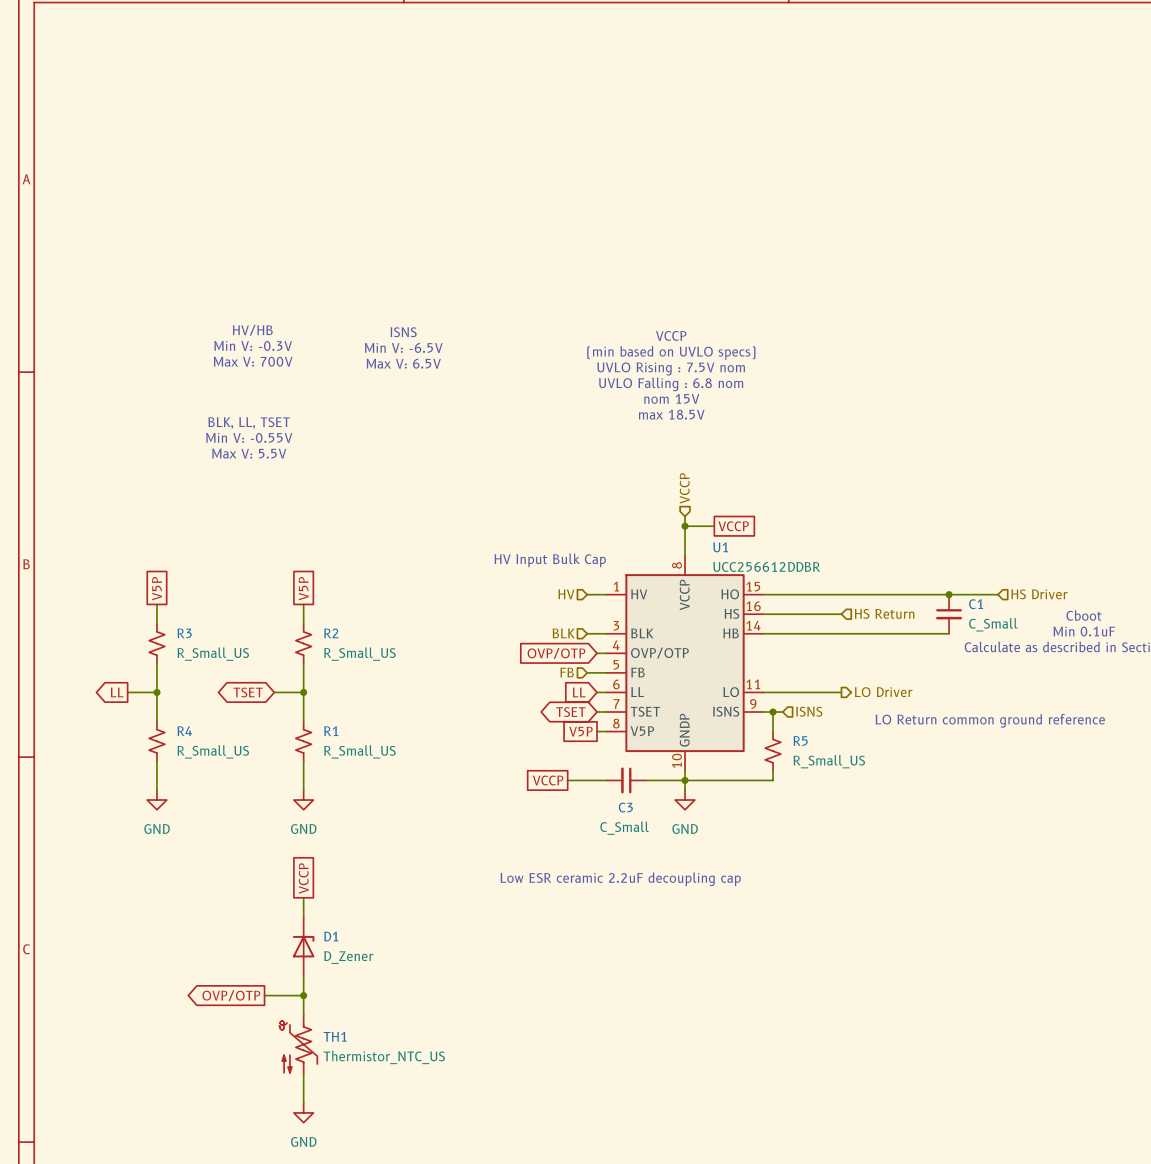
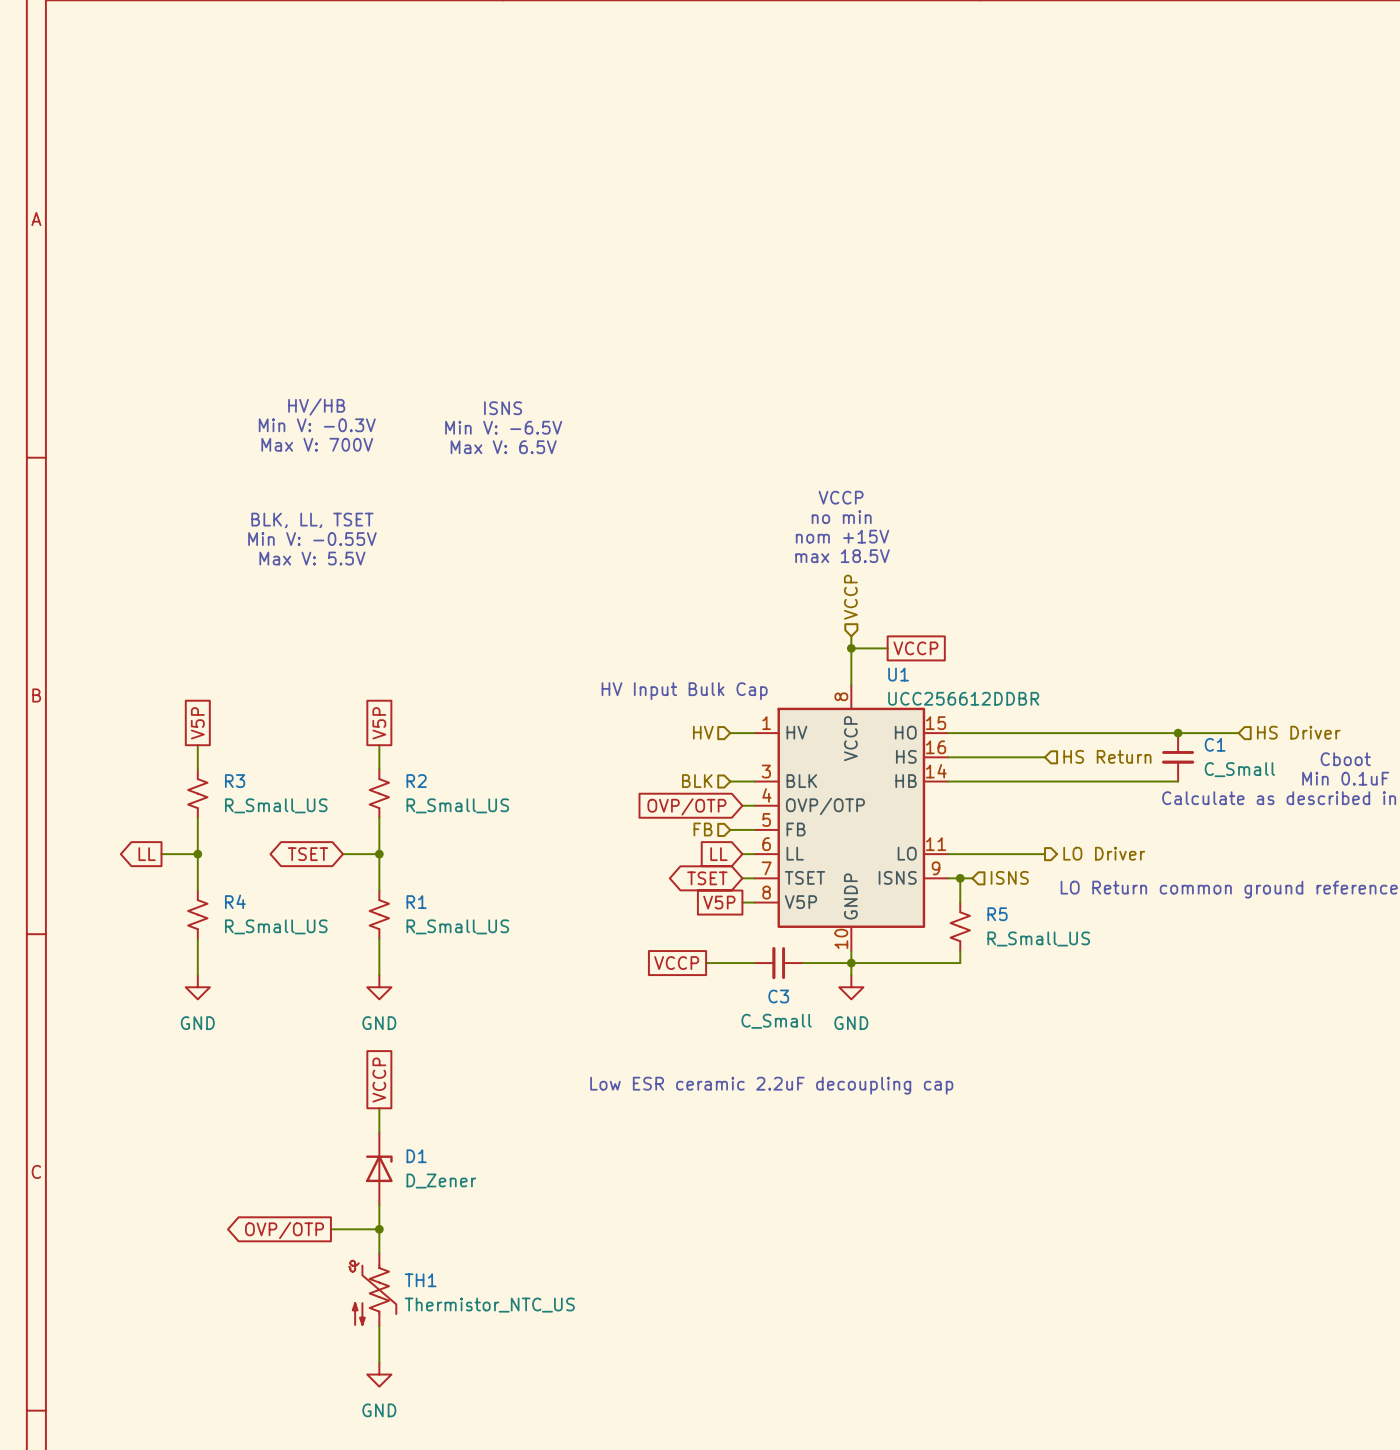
text position: VCCP (671, 335) -> VCCP (841, 497)
text: (min based on UVLO specs) (671, 352) -> none
text: UVLO Rising : 7.5V nom (671, 369) -> none
text: UVLO Falling : 6.8 nom (671, 384) -> none
text: nom 15V (671, 398) -> none
text position: max 18.5V (671, 414) -> max 18.5V (842, 556)
text: none -> no min (841, 517)
text: none -> nom +15V (842, 536)

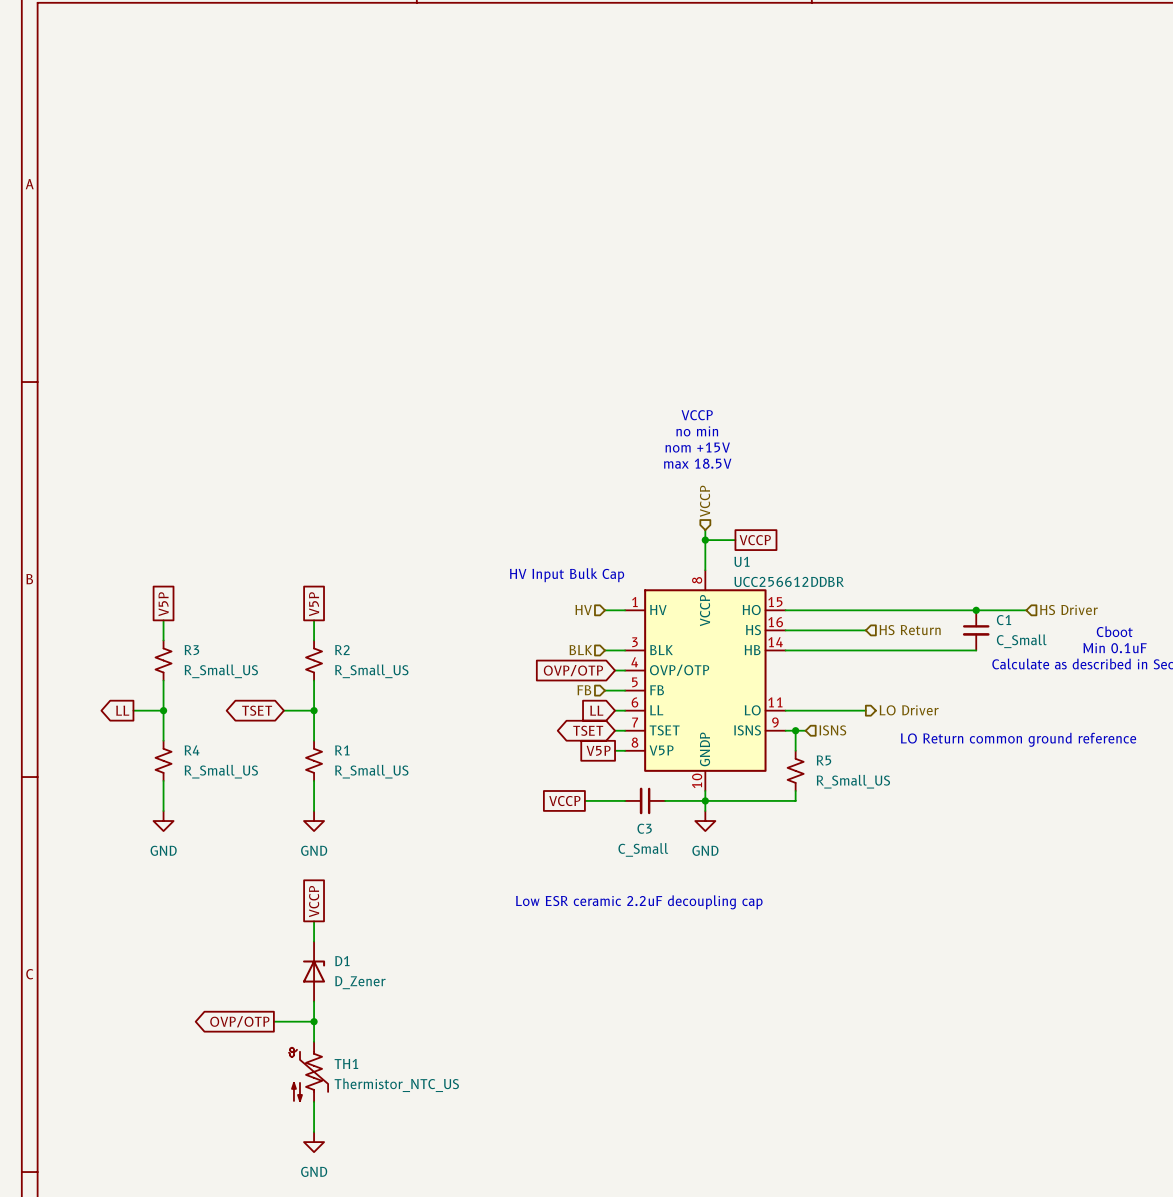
text: HV/HB (316, 406) -> none
text: ISNS (503, 408) -> none
text: Min V: -0.3V (317, 425) -> none
text: Min V: -6.5V (503, 427) -> none
text: Max V: 700V (317, 444) -> none
text: Max V: 6.5V (503, 447) -> none
text: BLK, LL, TSET (312, 520) -> none
text: Min V: -0.55V (312, 539) -> none
text: Max V: 5.5V (312, 558) -> none

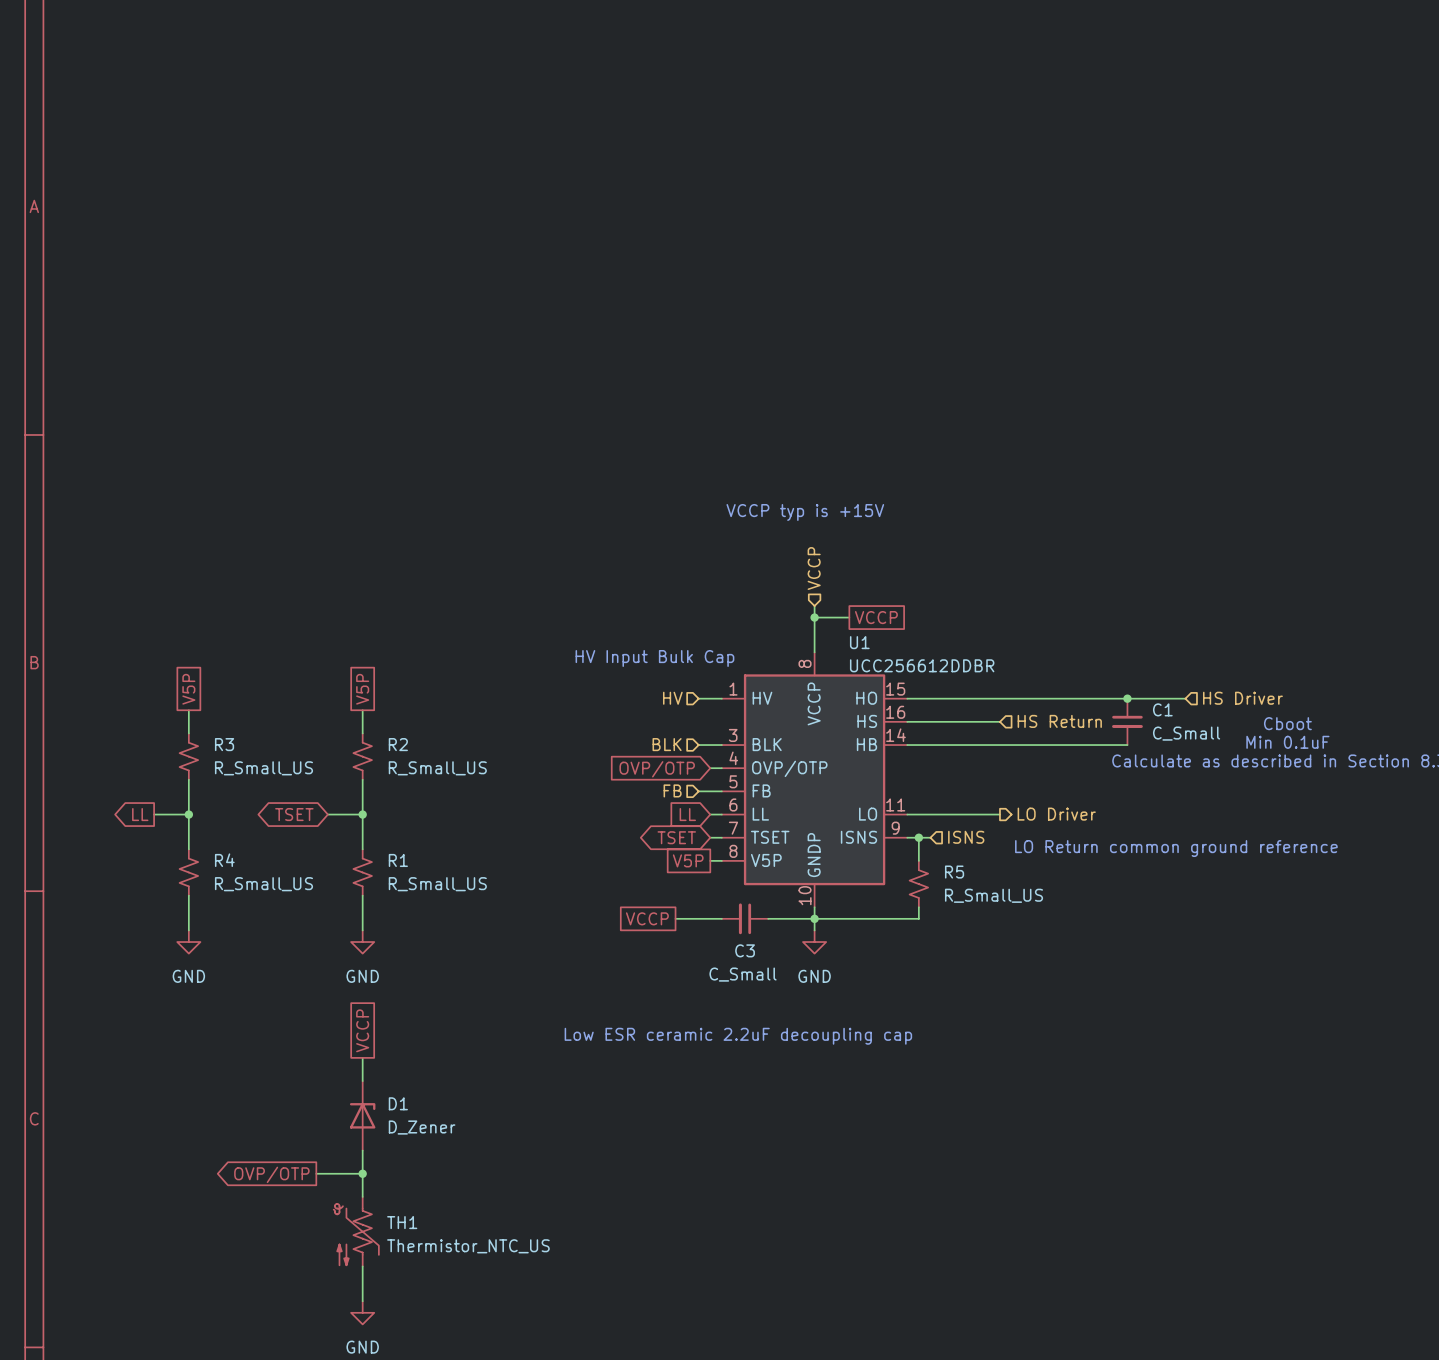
text: VCCP (697, 415) -> none
text: no min (697, 431) -> none
text: nom +15V (697, 447) -> VCCP typ is +15V (805, 512)
text: max 18.5V (697, 463) -> none

